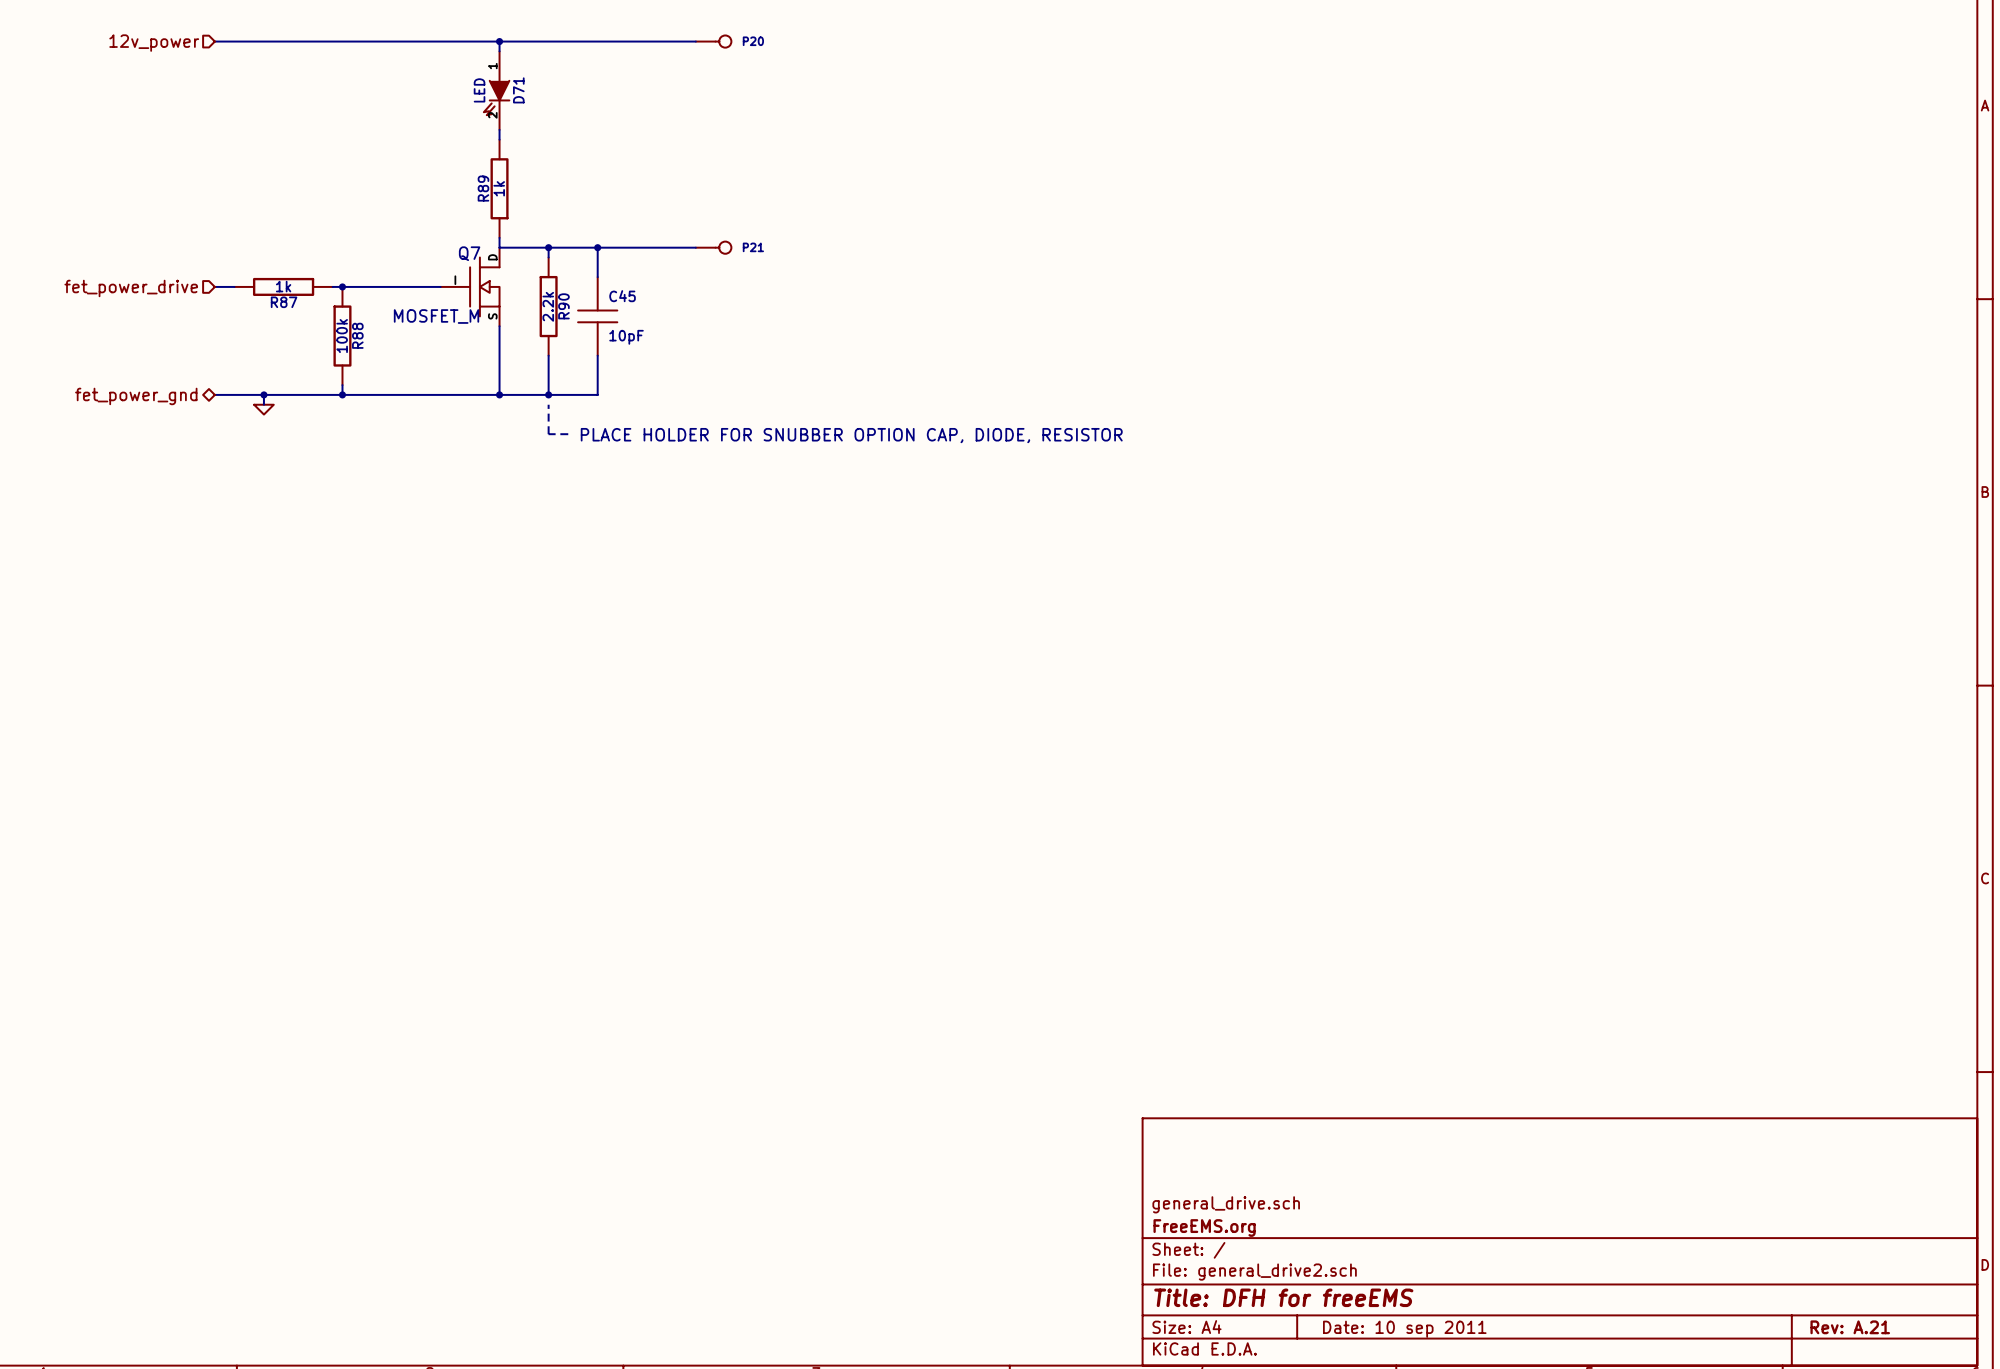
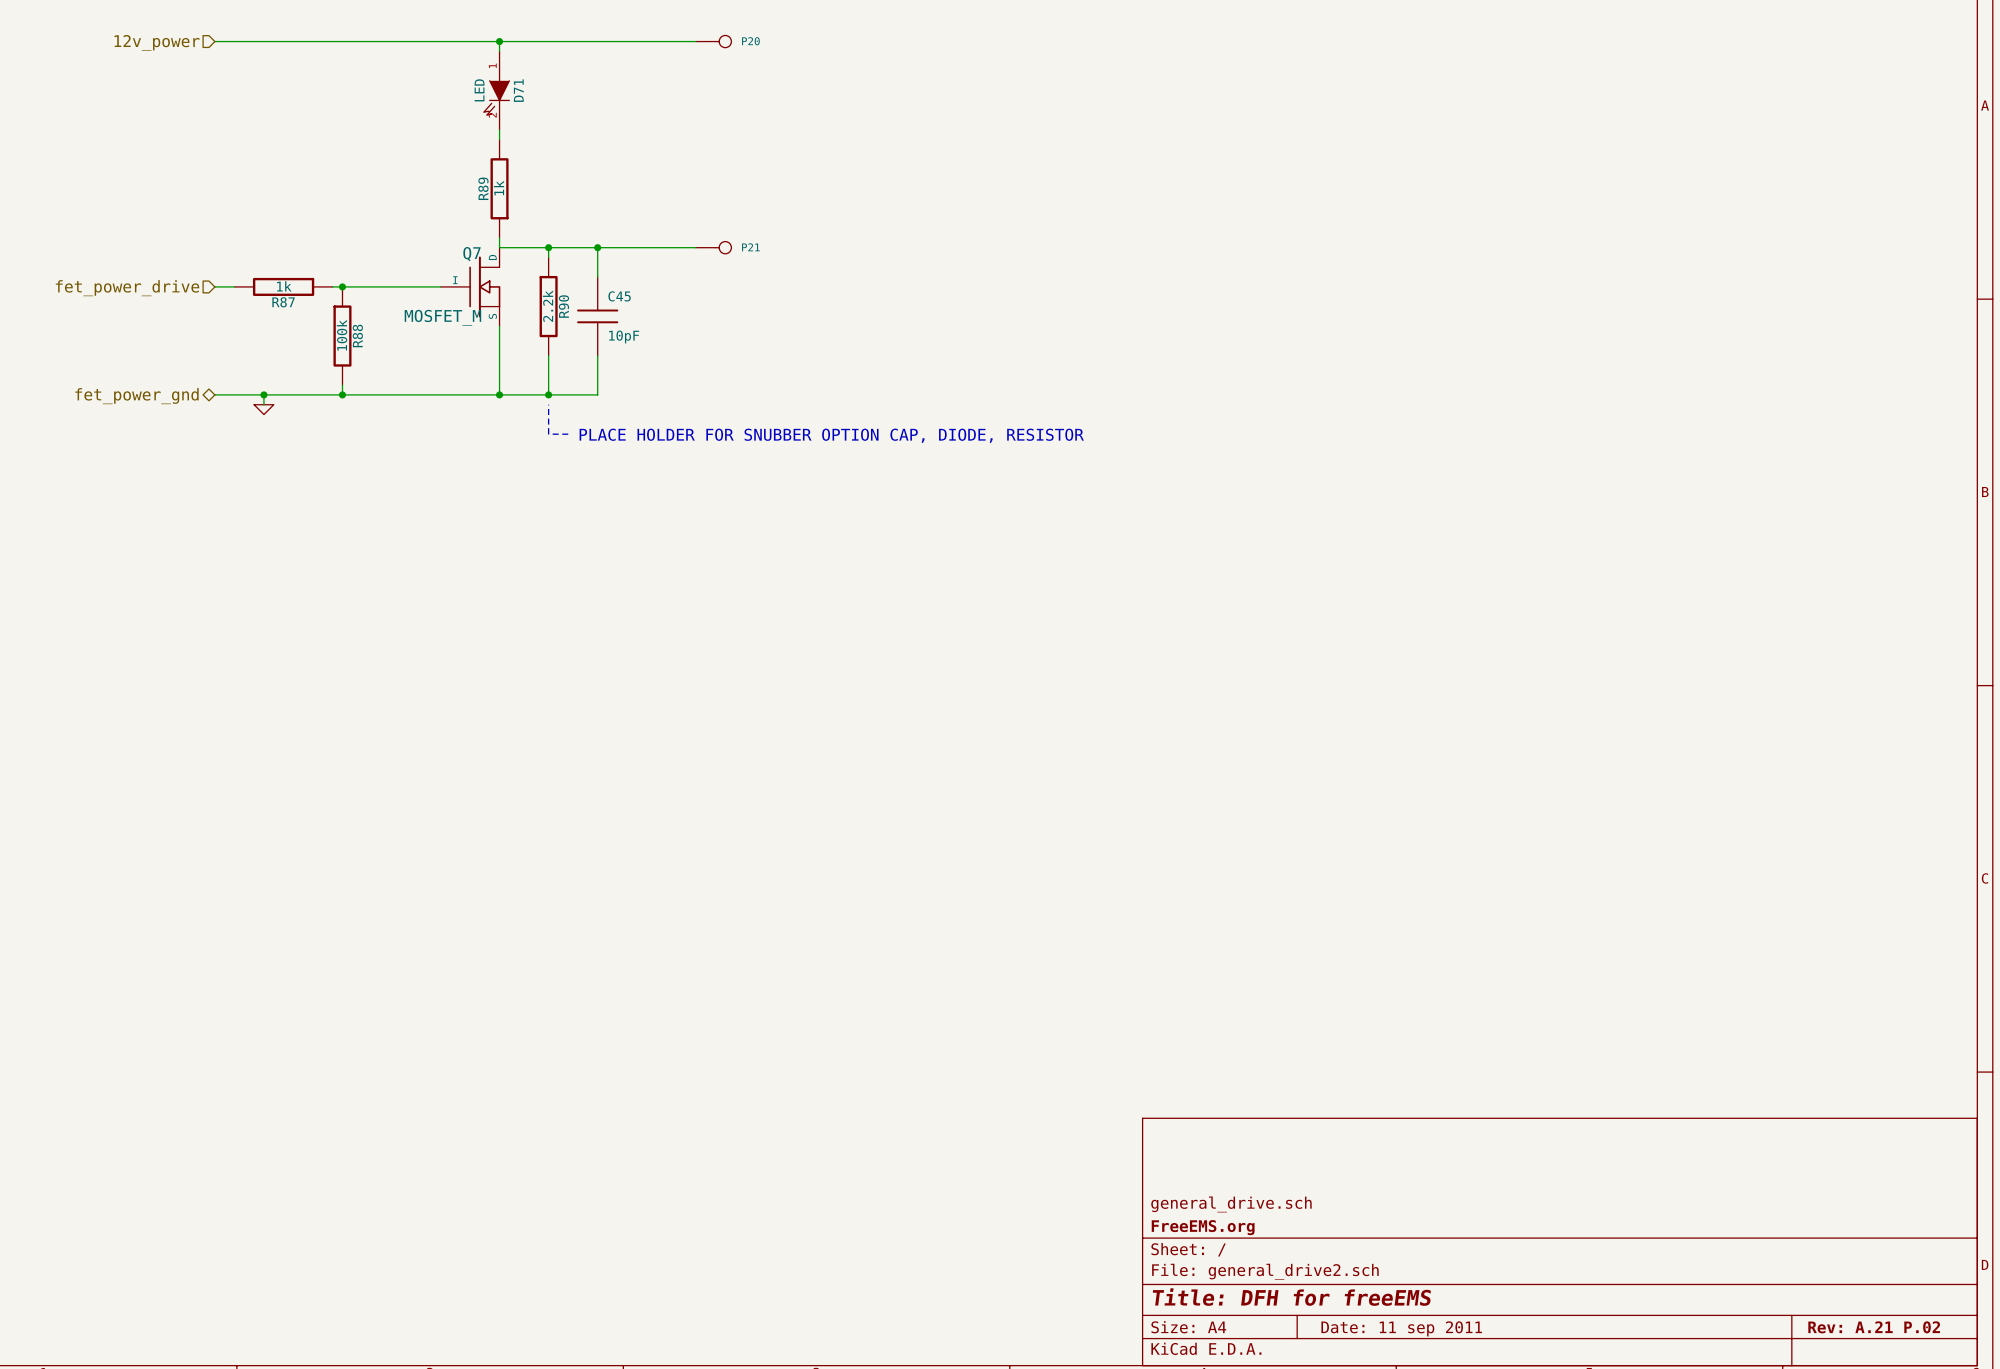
title block: Rev: A.21 (1850, 1327) -> Rev: A.21 P.02 (1874, 1327)
title block: Date: 10 sep 2011 (1404, 1329) -> Date: 11 sep 2011 (1401, 1328)

